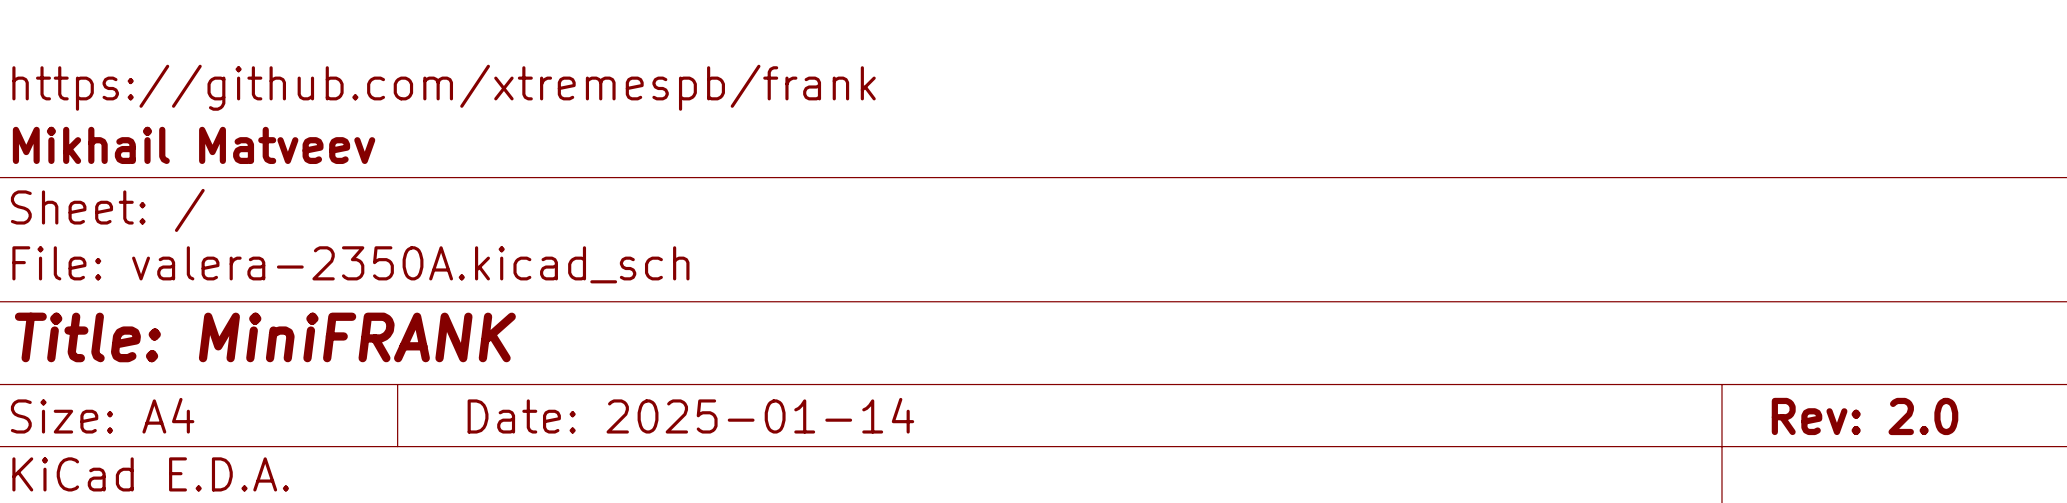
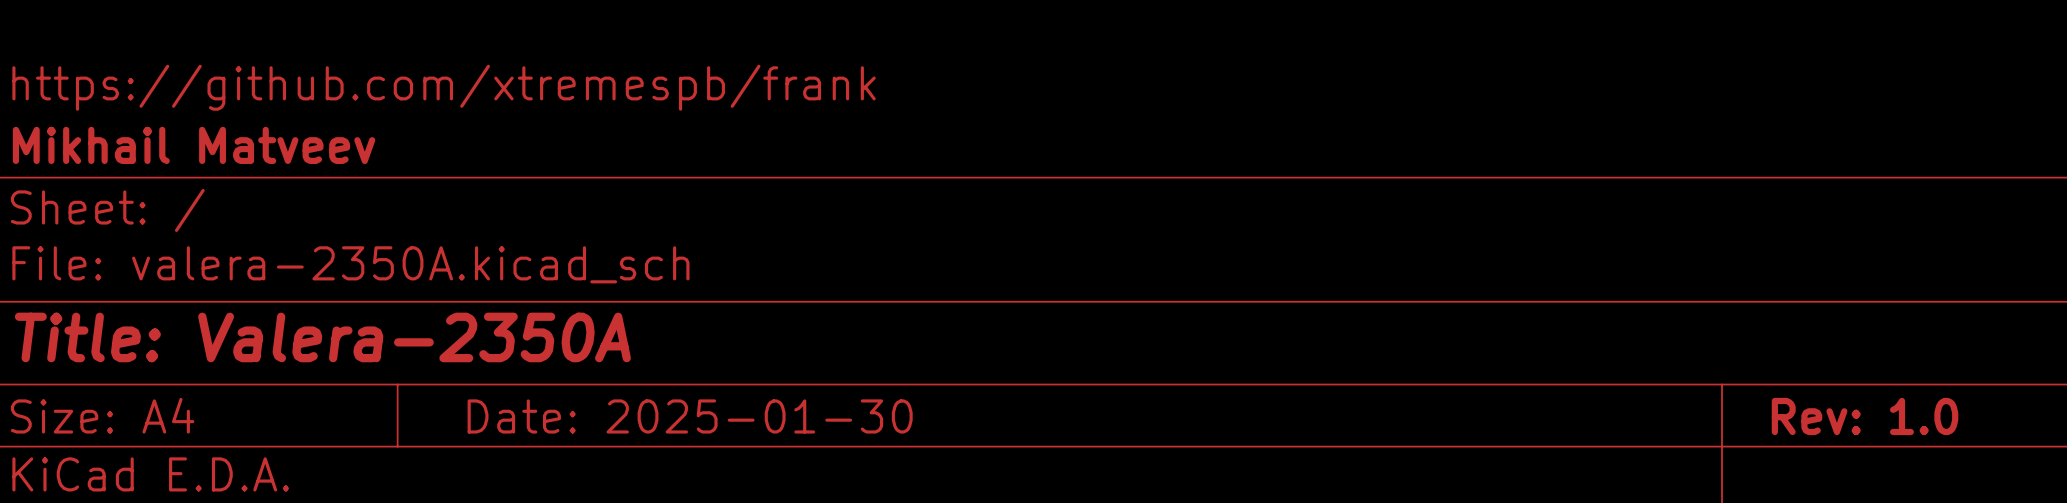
title block: Title: MiniFRANK (265, 337) -> Title: Valera-2350A (322, 337)
title block: Date: 2025-01-14 (690, 415) -> Date: 2025-01-30 (690, 416)
title block: Rev: 2.0 (1865, 416) -> Rev: 1.0 (1865, 416)

